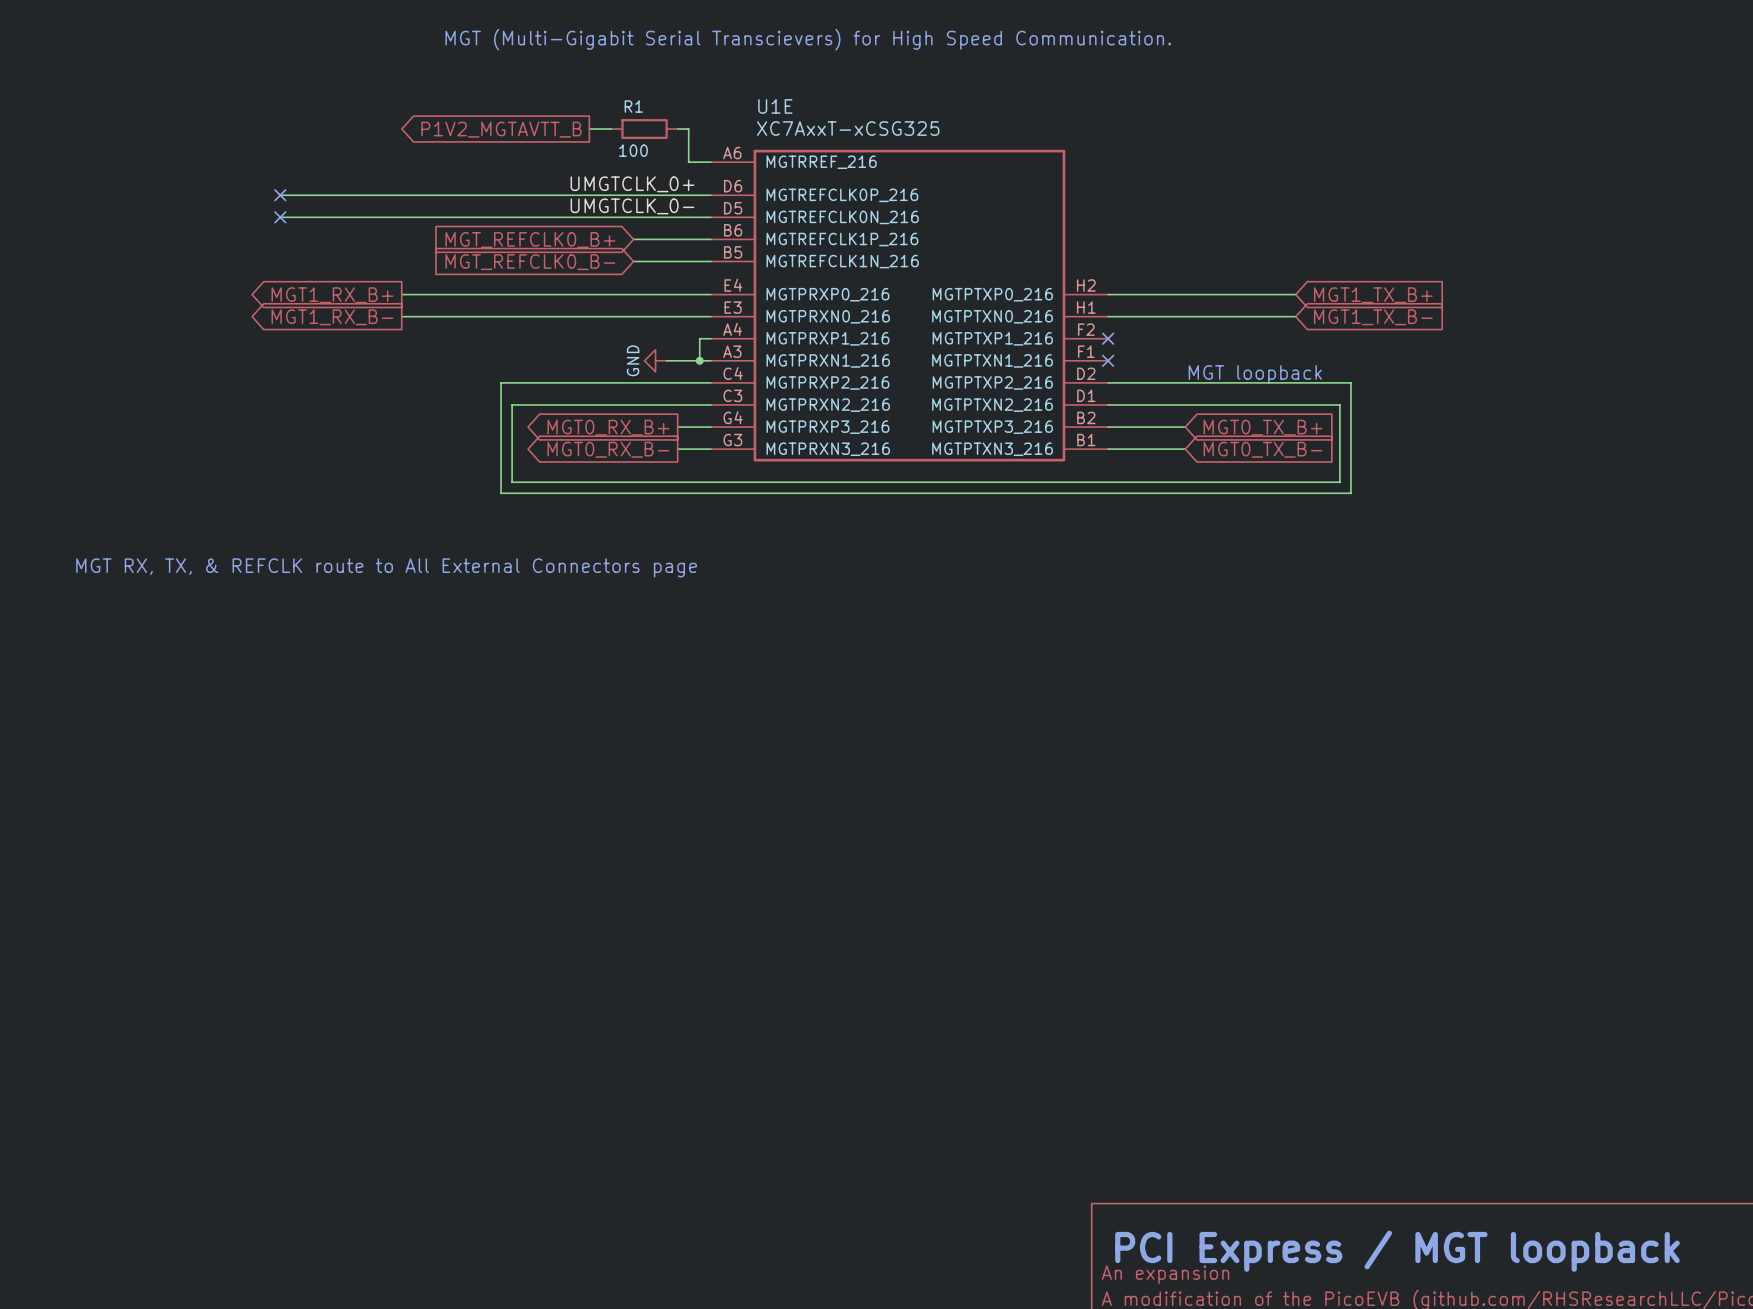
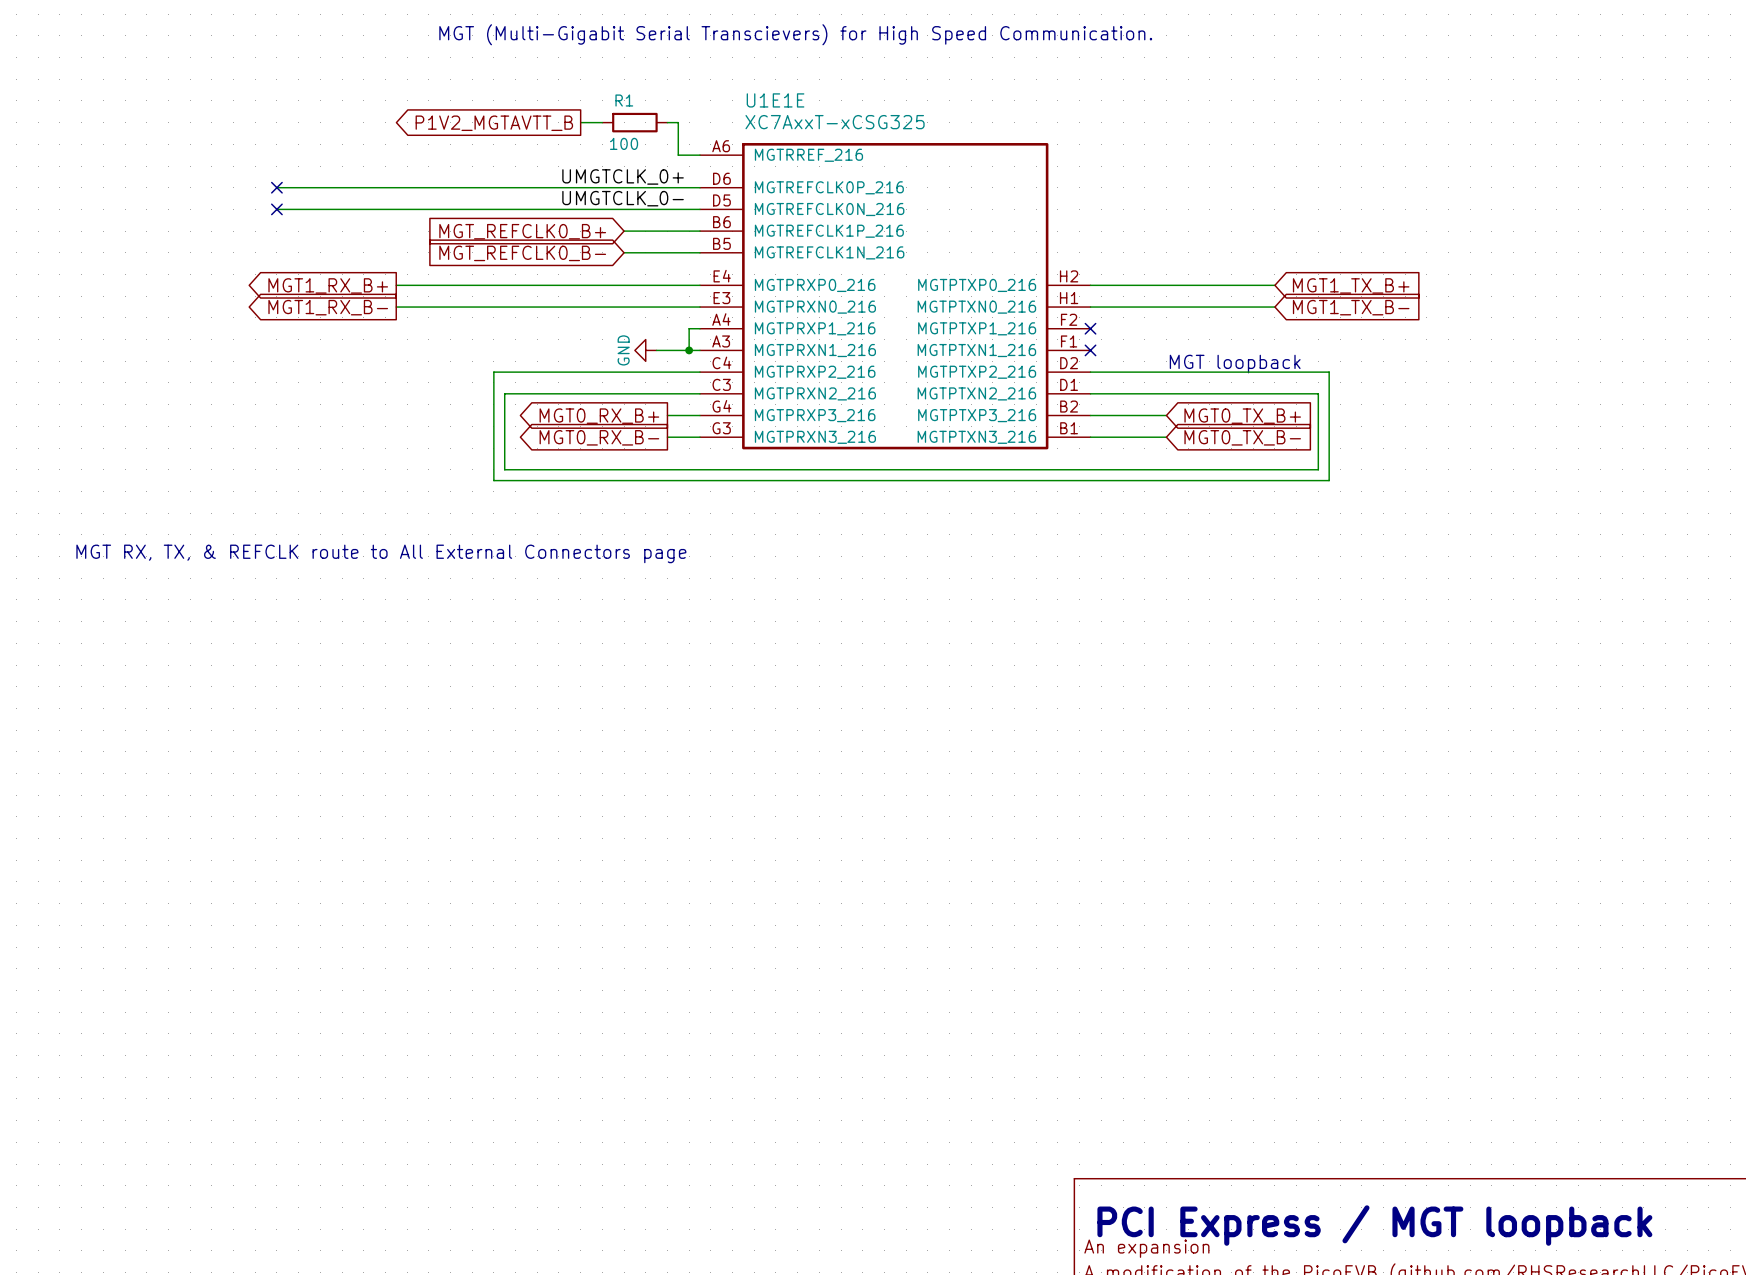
U1E name: U1E (775, 106) -> U1E1E (775, 100)

